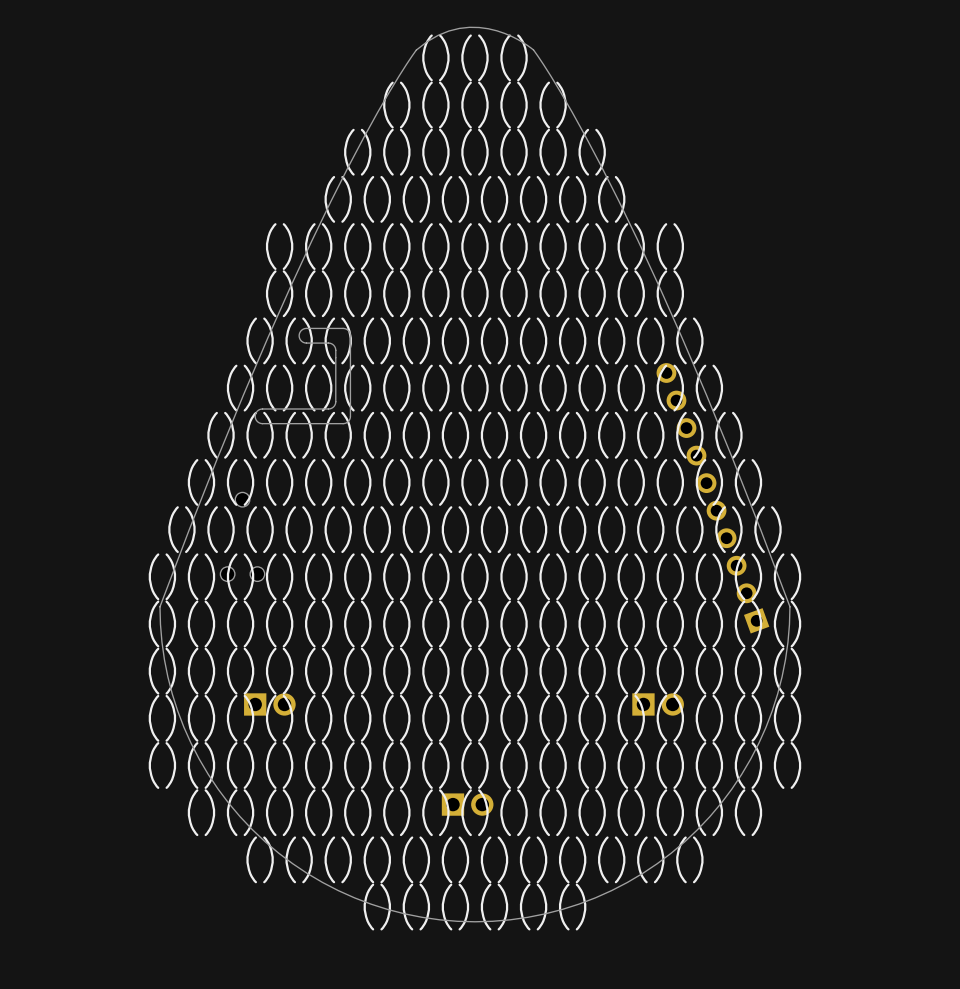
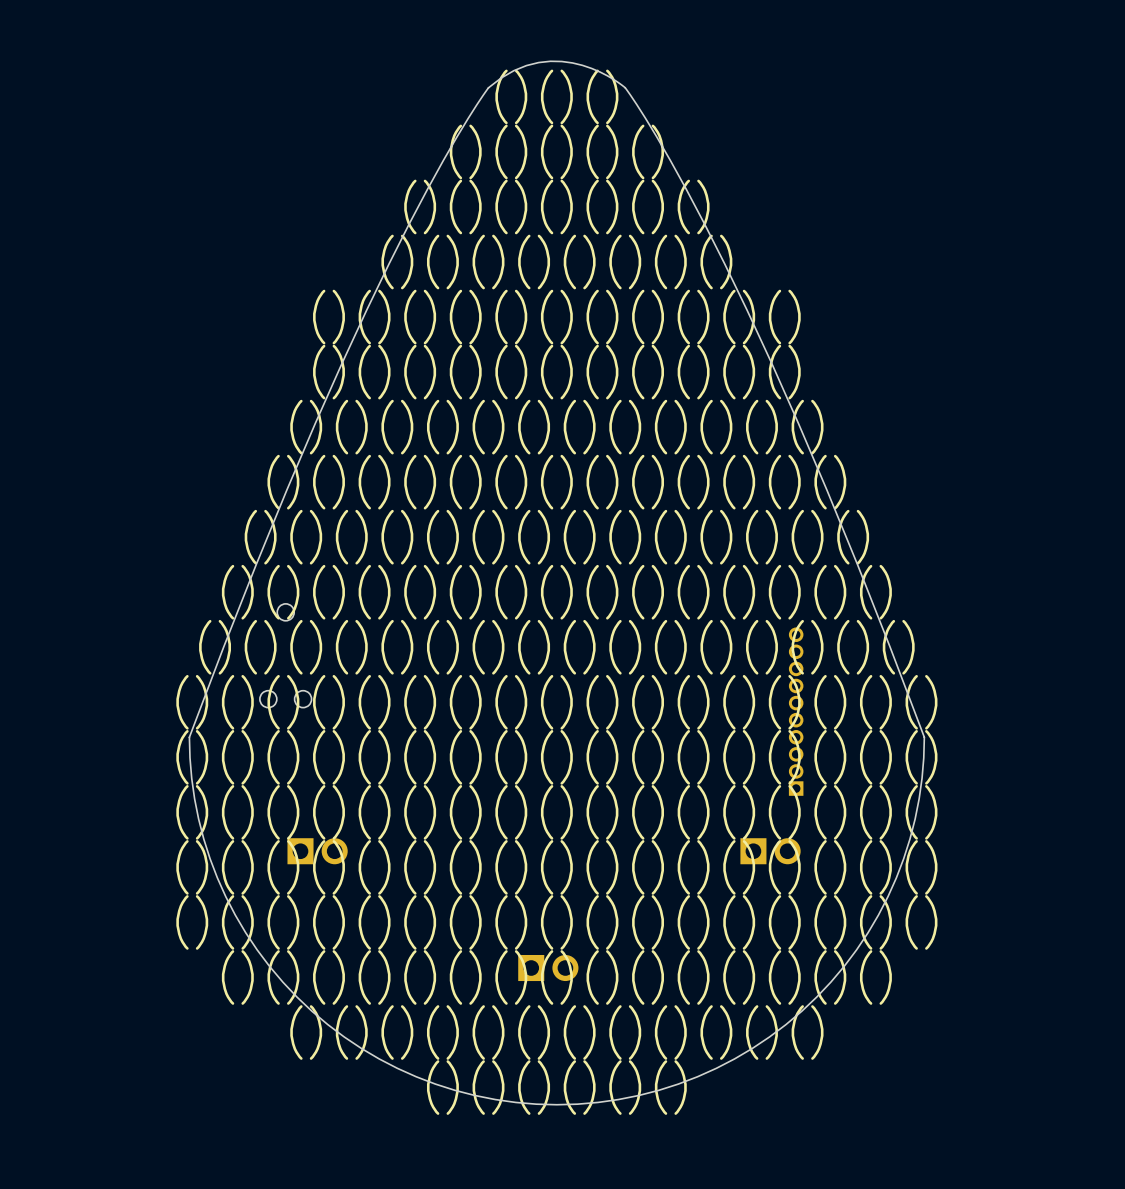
board edge: (343, 328) (305, 328) (301, 330) (299, 334) (300, 339) (303, 342) (329, 343) (335, 347) (335, 401) (333, 406) (328, 409) (261, 409) (255, 413) (257, 421) (262, 423) (343, 423) (348, 421) (350, 416) (350, 335) (348, 330) (343, 328) -> none
part: (712, 498) -> none
part: none -> (796, 711)

